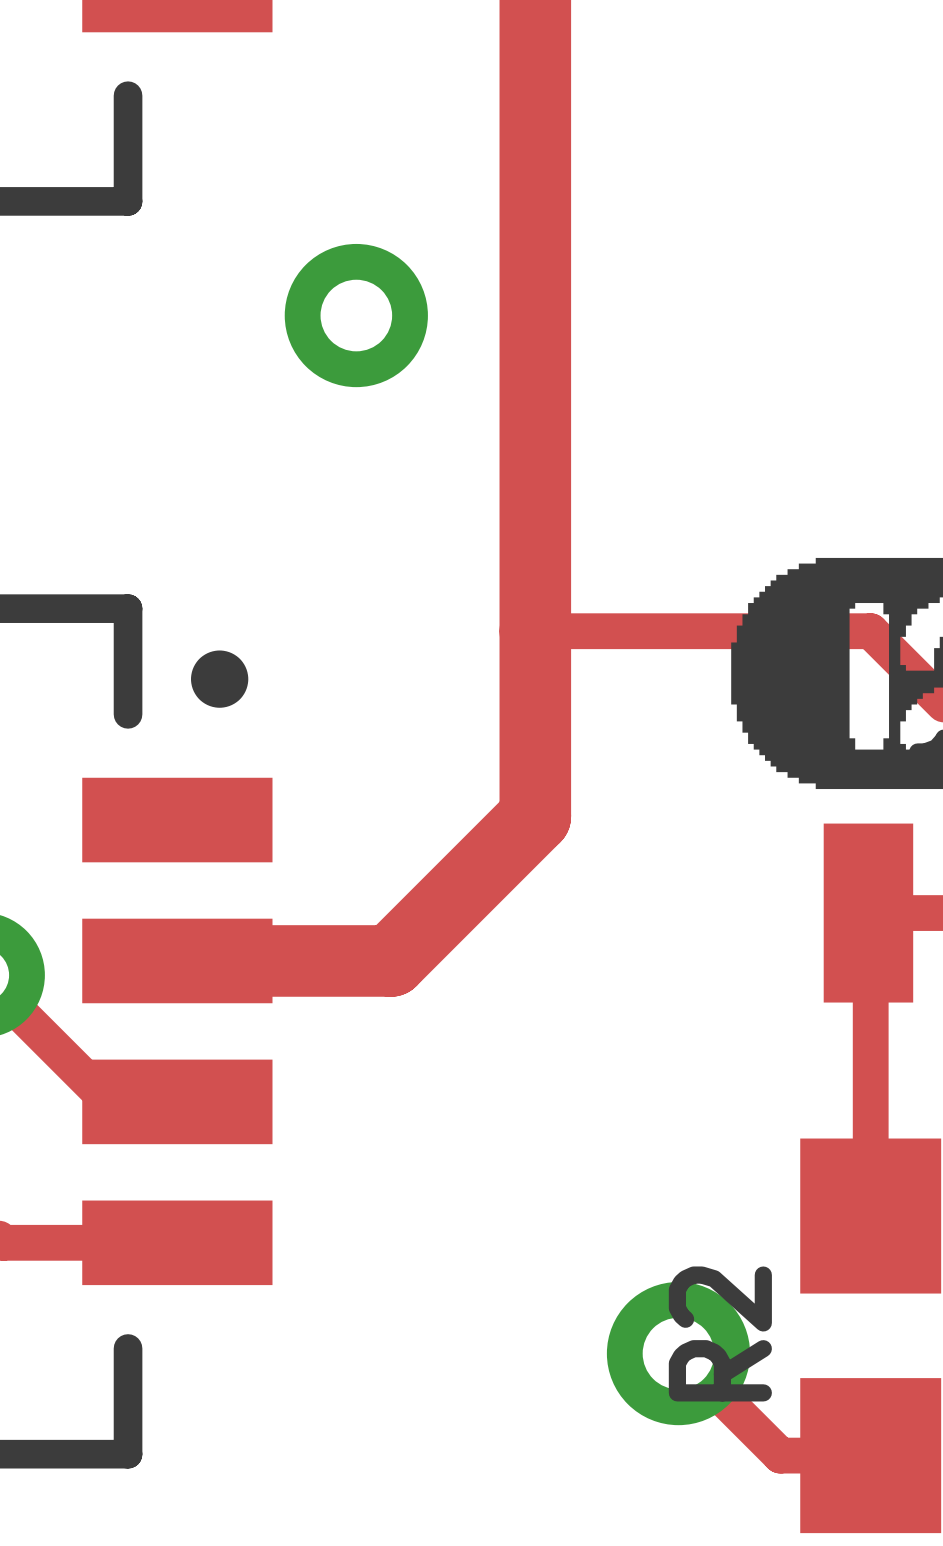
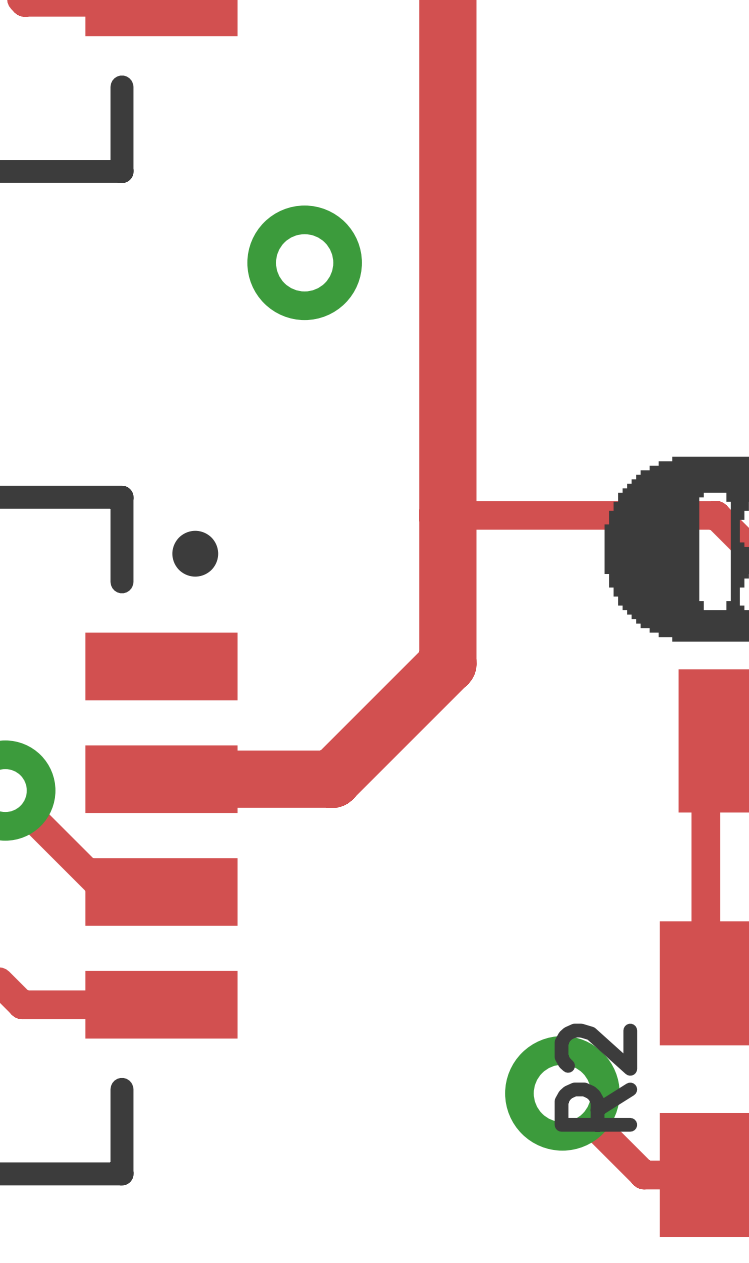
track: none -> (705, 740) (705, 972)
track: (868, 913) (870, 915) (870, 1216) -> none

